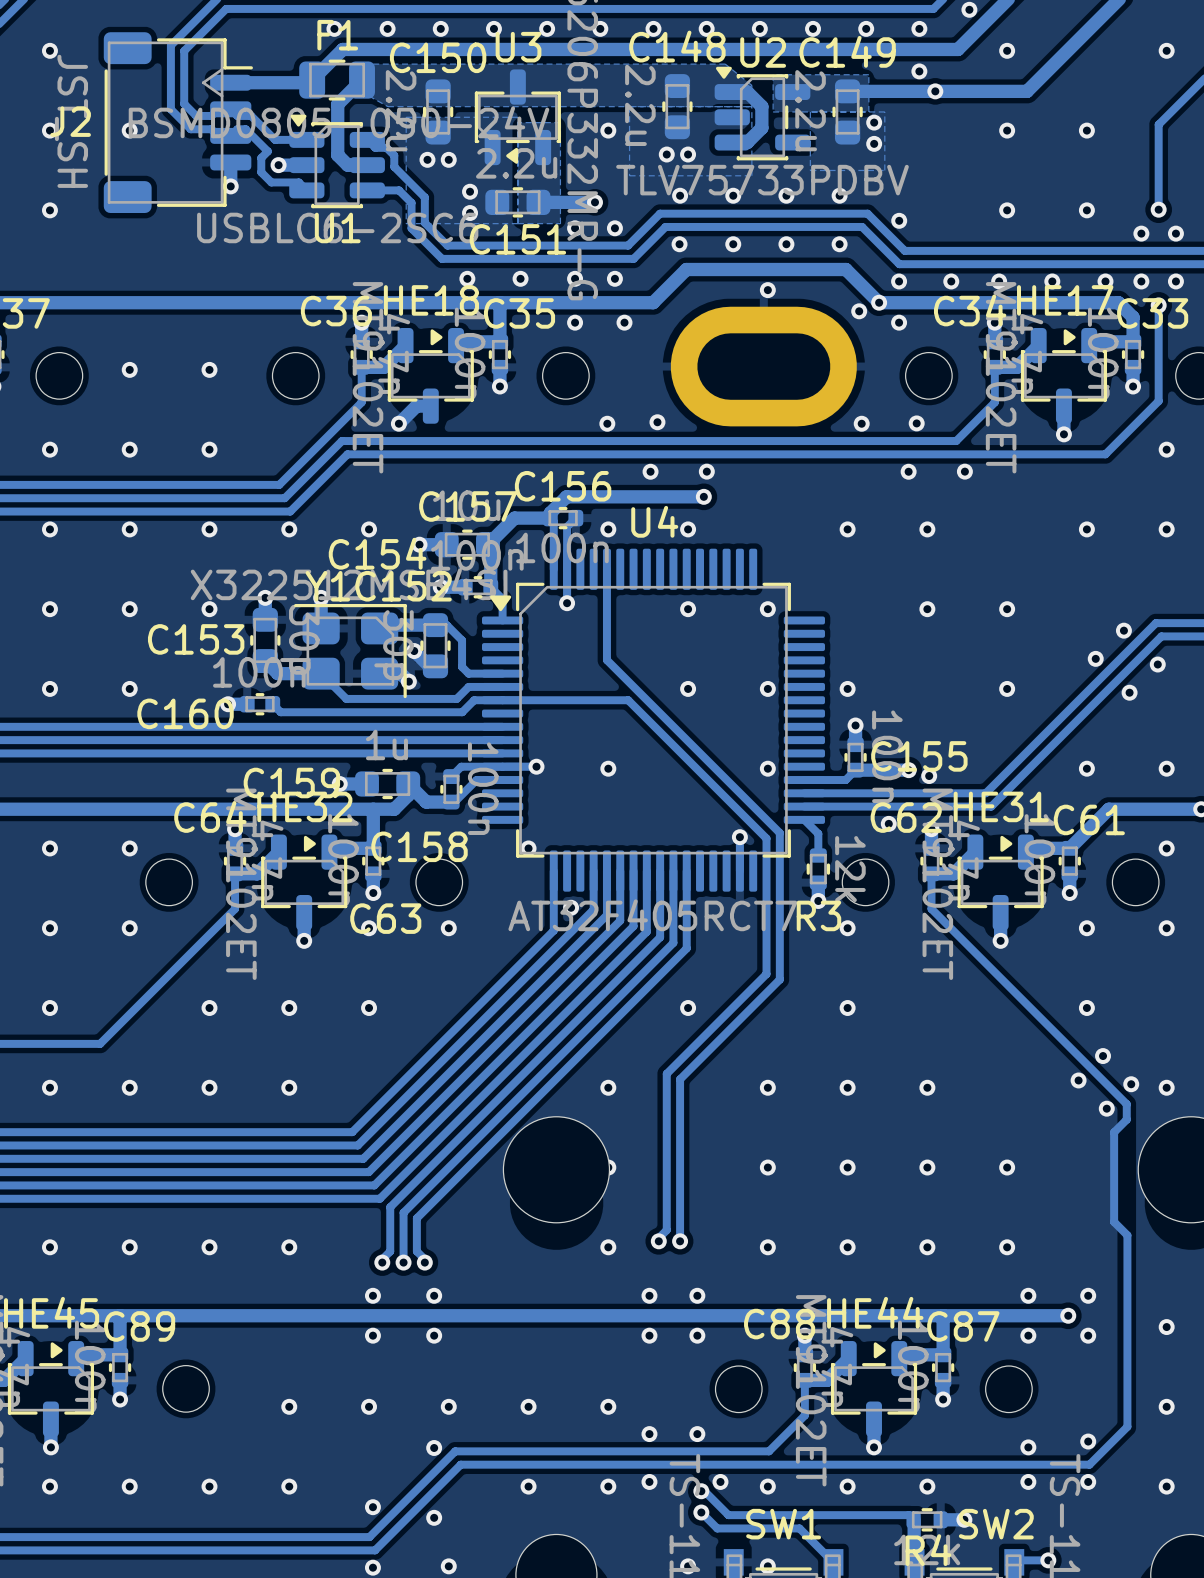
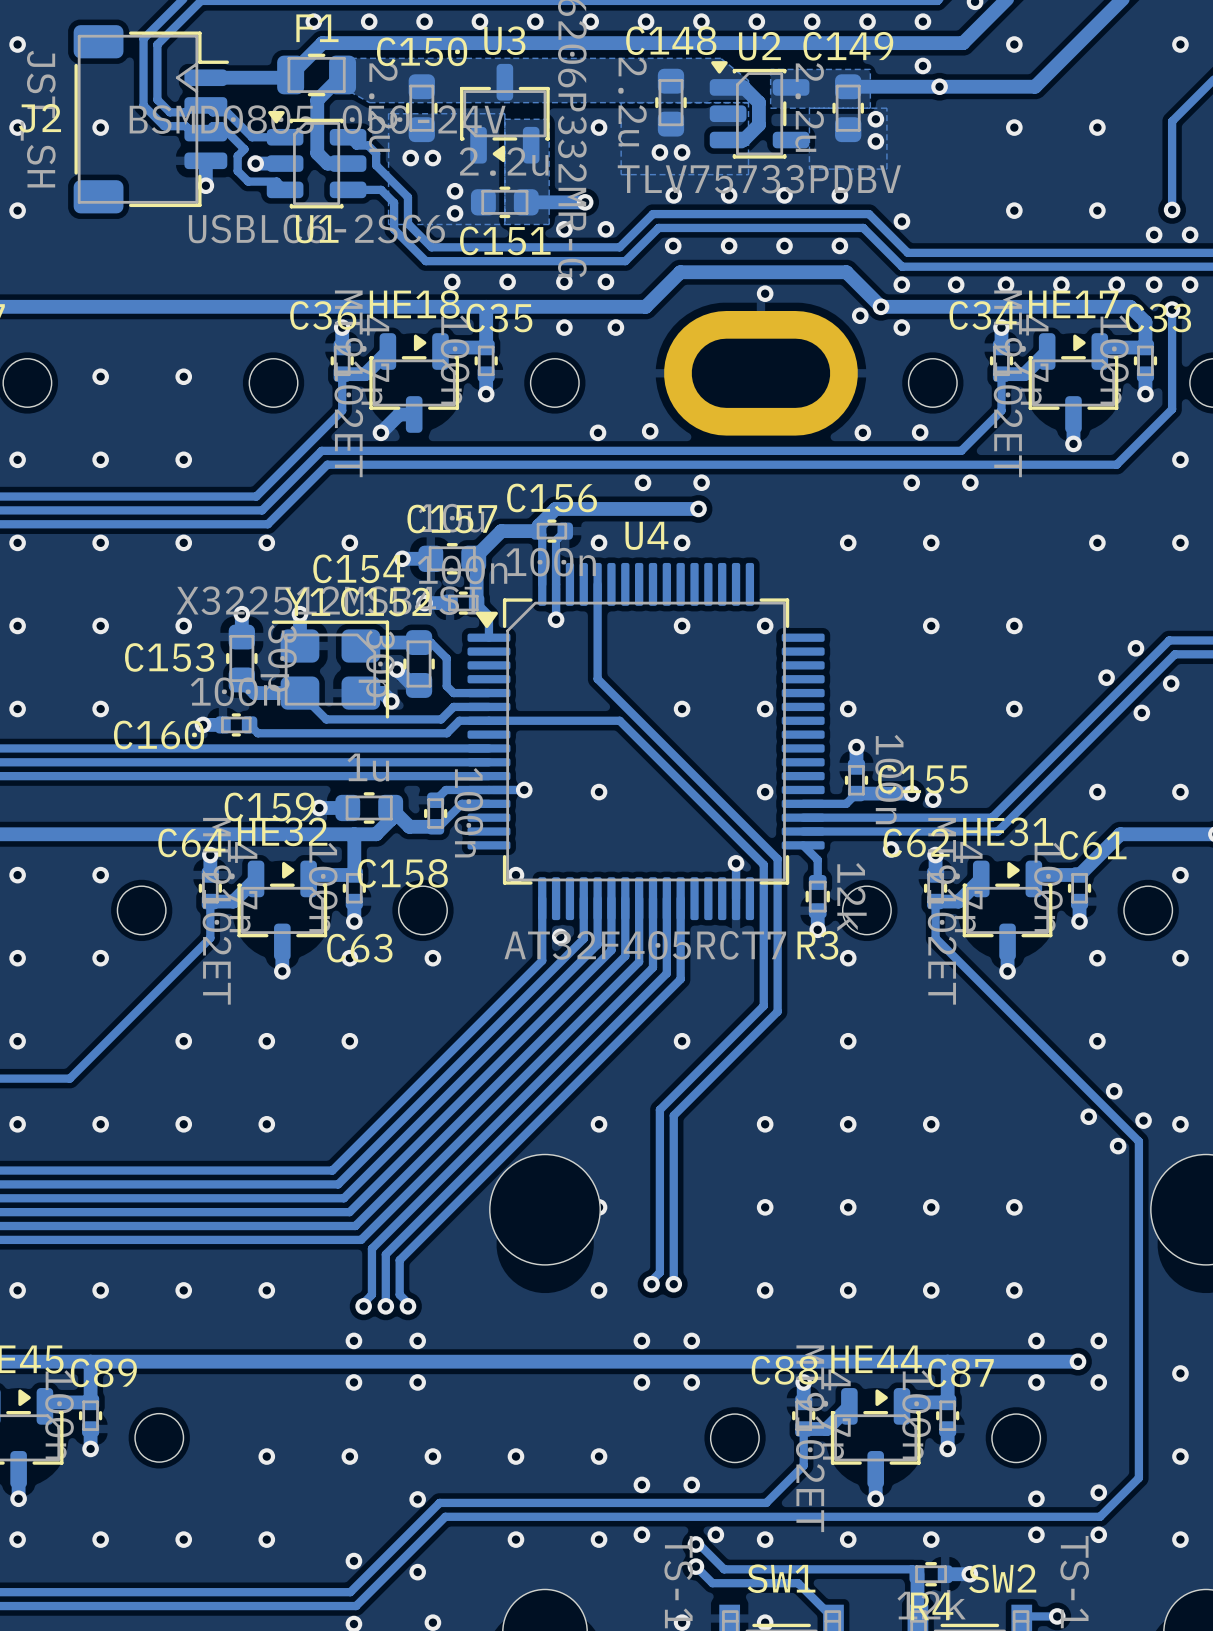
track: (1126, 1119) (1114, 1132) (1114, 1222) (1127, 1235) (1126, 1427) -> (1138, 1157) (1138, 1478)

